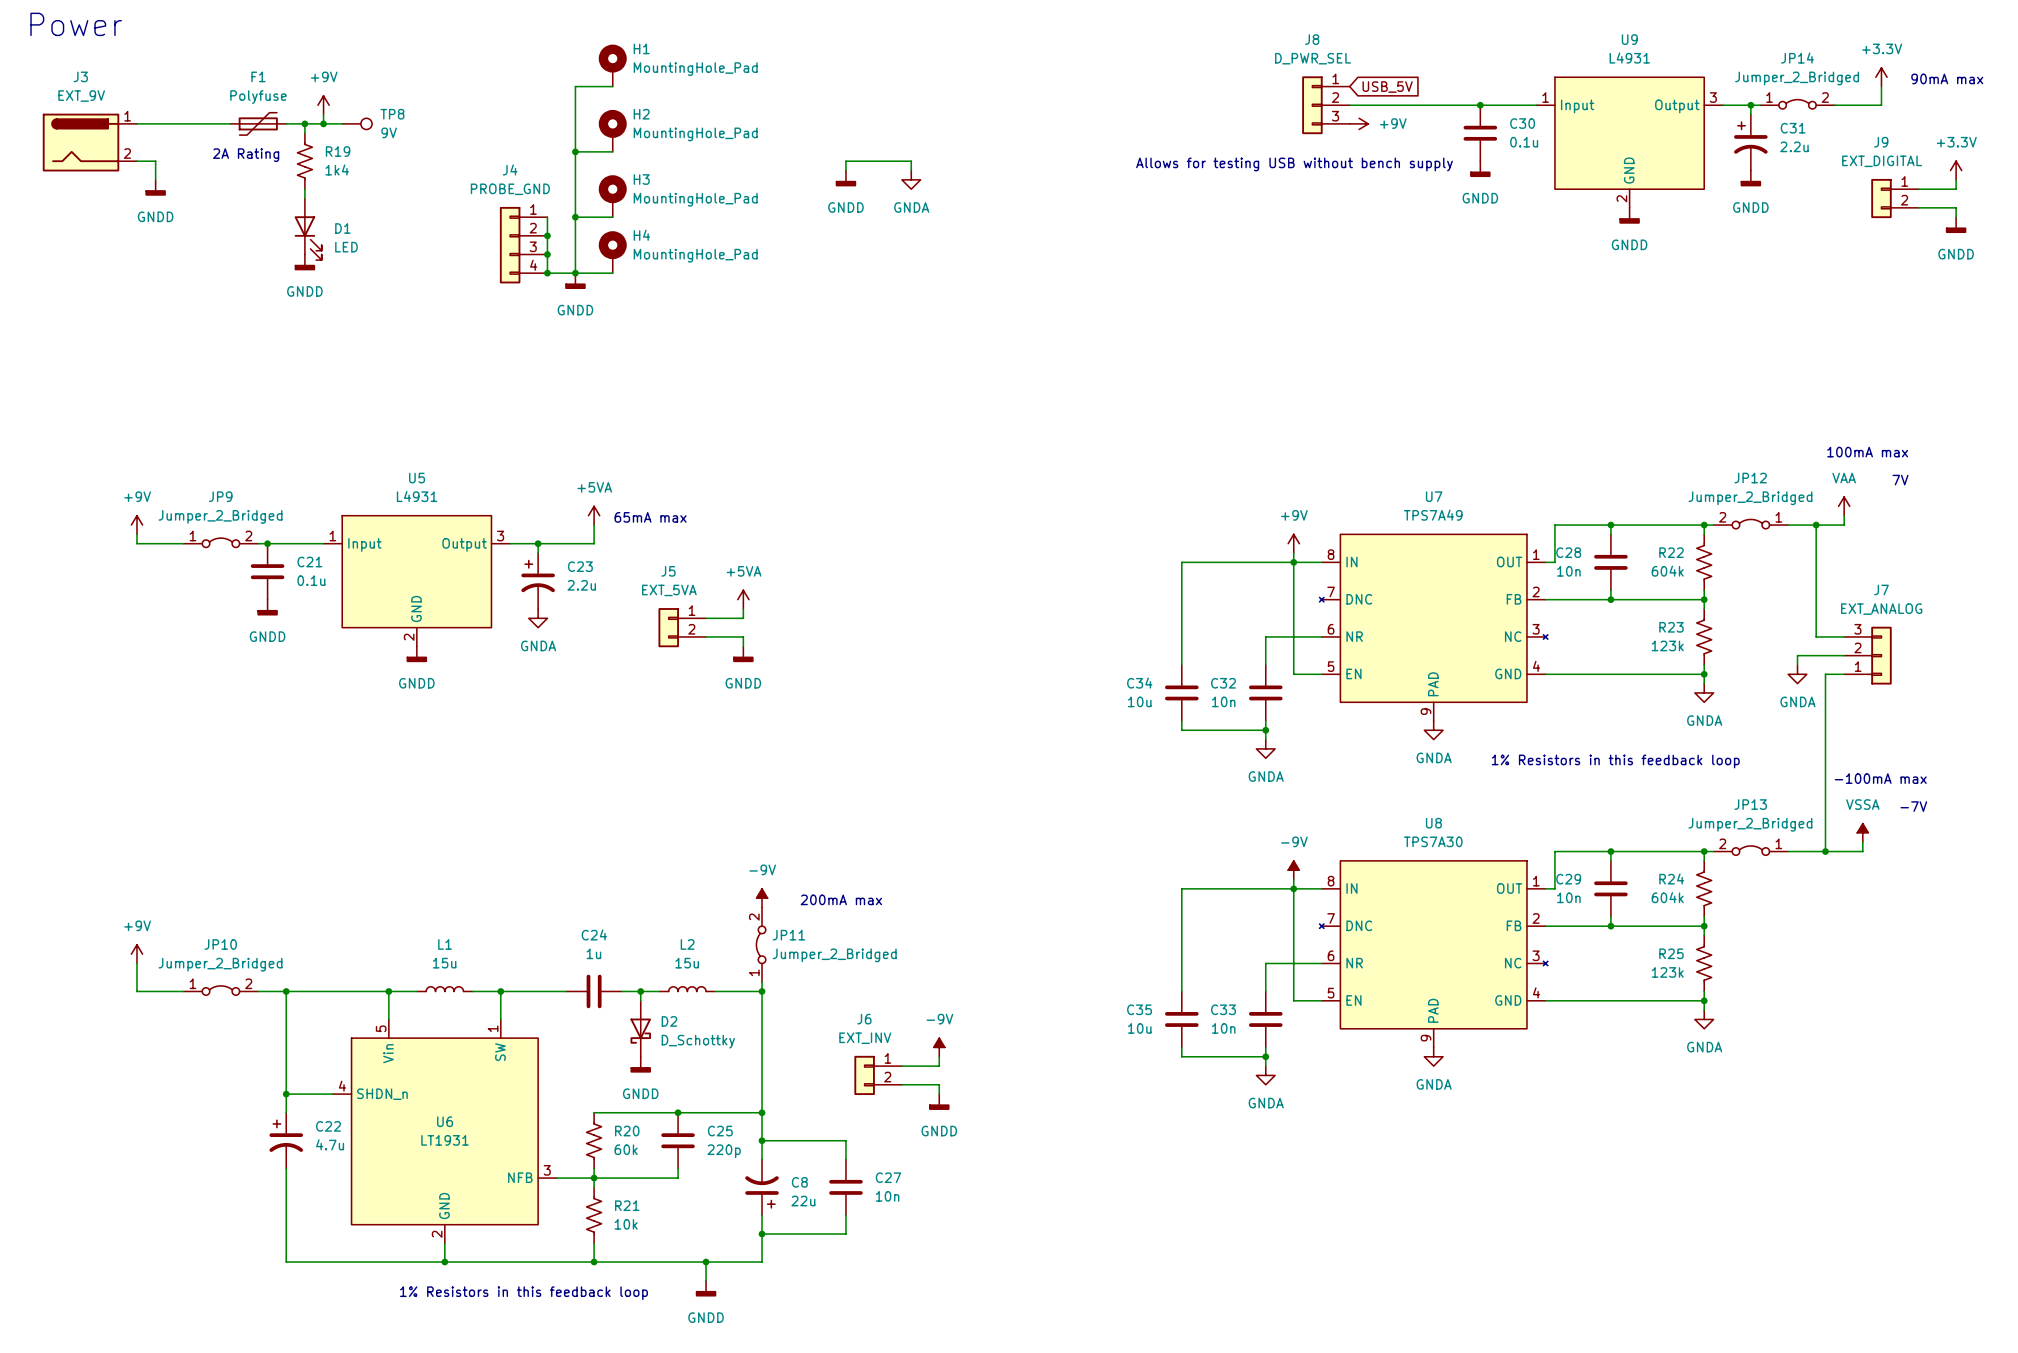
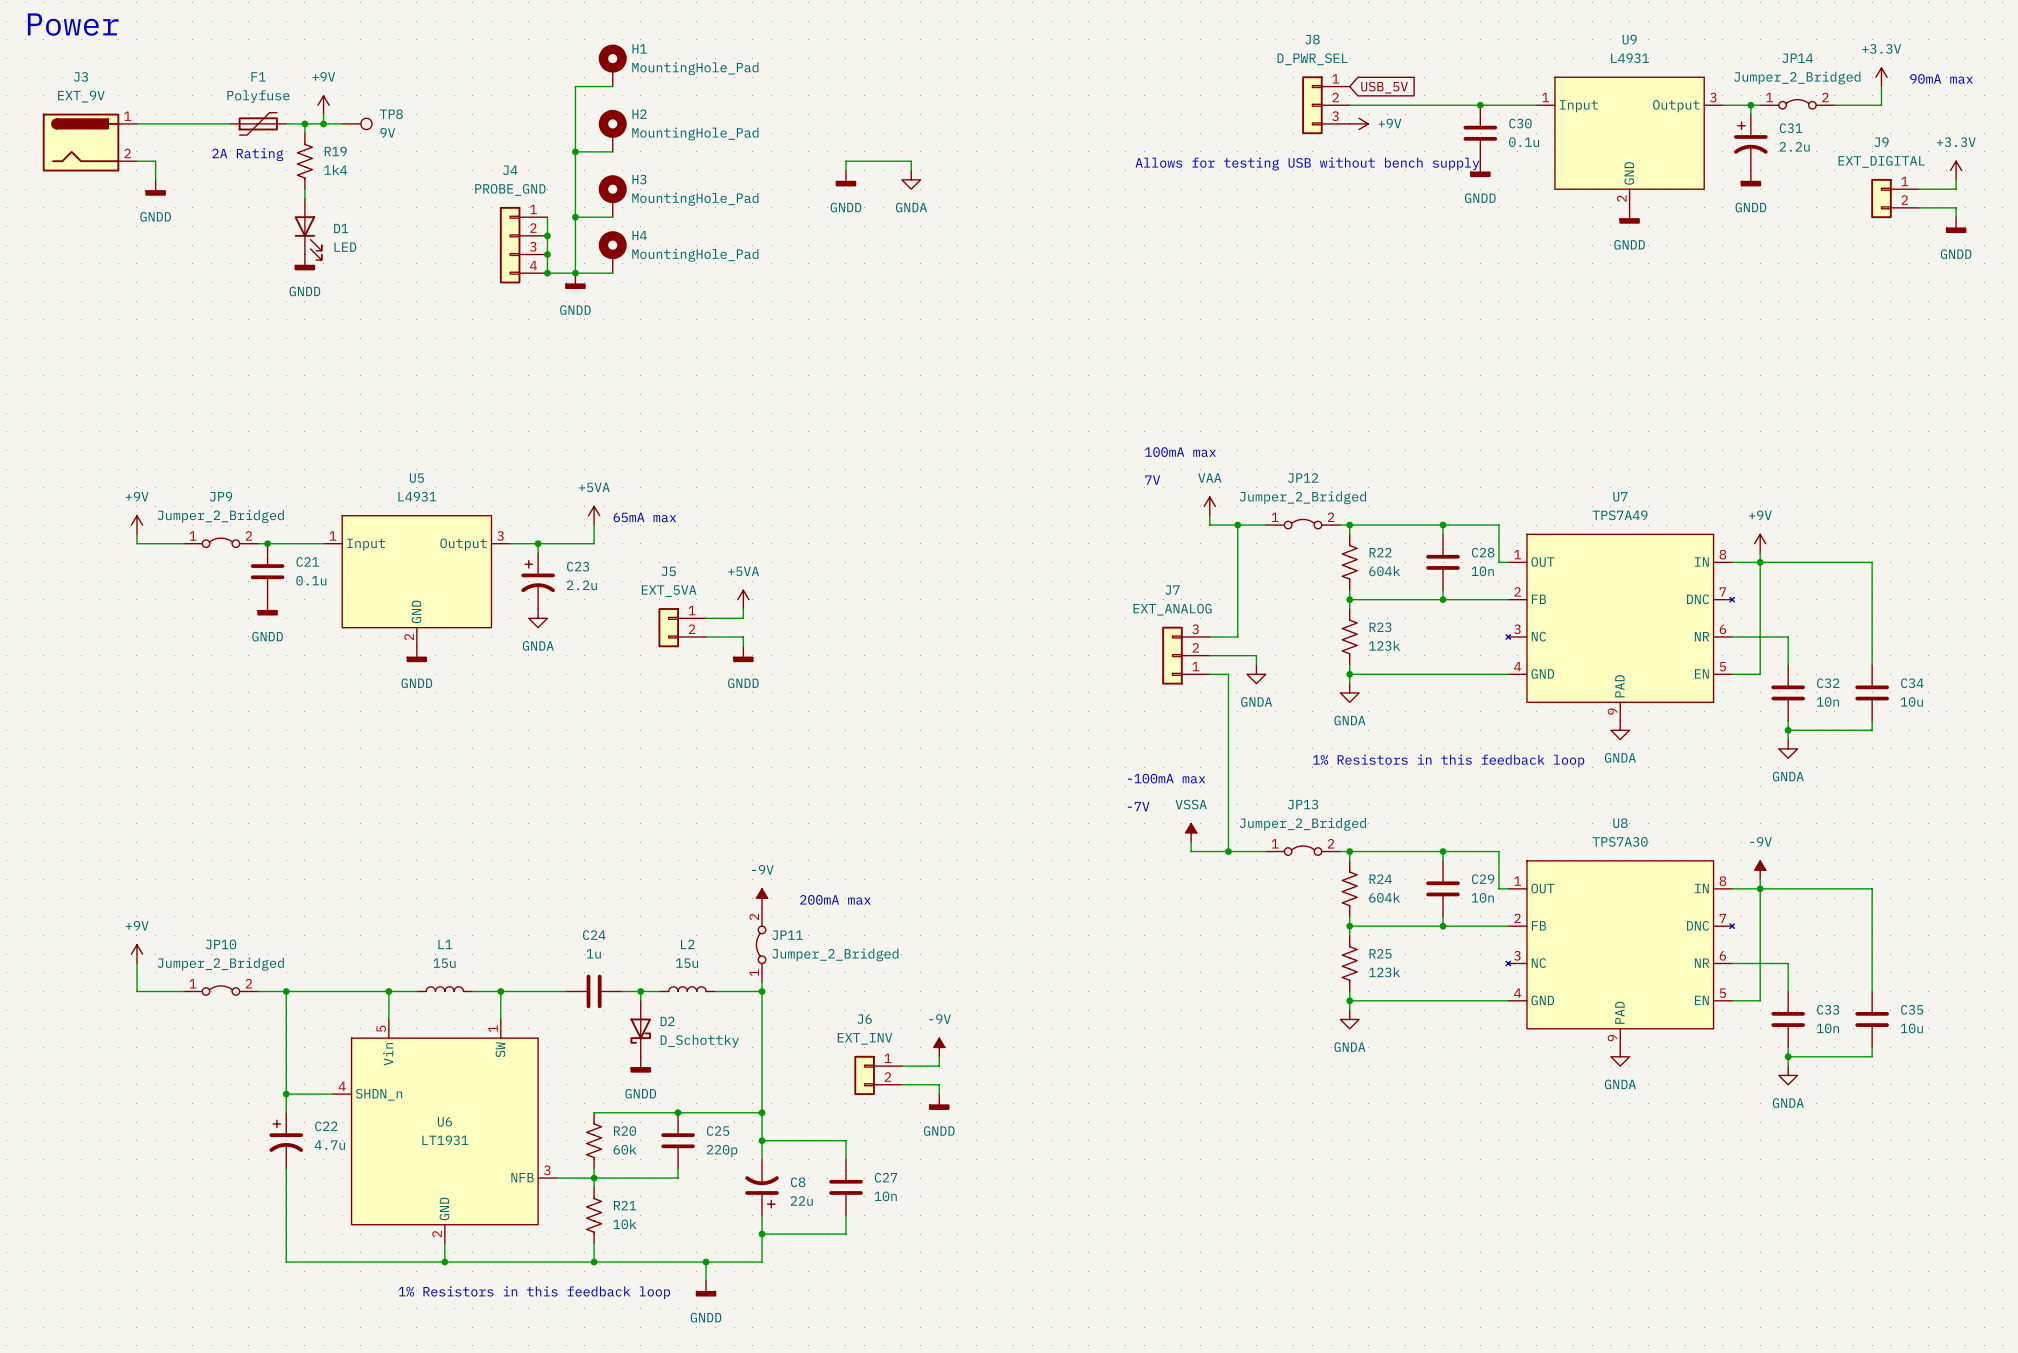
text: none -> 100mA max (1180, 452)
text: 100mA max (1867, 452) -> none
text: none -> 7V (1152, 480)
text: 7V (1900, 480) -> none
power symbol: none -> VAA (1209, 506)
power symbol: VAA (1844, 506) -> none
wire: none -> (1209, 515) (1209, 525) (1265, 525)
wire: (1844, 515) (1844, 525) (1788, 525) -> none
JP12 flip: as is (1750, 524) -> left-right (1303, 524)
JP12 position: (1750, 524) -> (1303, 524)
wire: none -> (1237, 525) (1237, 636) (1209, 636)
junction: none -> (1237, 525)
wire: none -> (1340, 525) (1498, 525) (1498, 562) (1508, 562)
wire: none -> (1349, 525) (1349, 534)
junction: none -> (1349, 525)
junction: none -> (1443, 525)
wire: (1610, 525) (1610, 534) -> (1443, 525) (1443, 534)
junction: (1610, 525) -> none
wire: (1704, 525) (1704, 534) -> none
junction: (1704, 525) -> none
wire: (1713, 525) (1554, 525) (1554, 562) (1545, 562) -> none
wire: (1816, 525) (1816, 636) (1844, 636) -> none
junction: (1816, 525) -> none
power symbol: +9V (1293, 543) -> none
power symbol: none -> +9V (1760, 543)
C28 name position: C28 (1568, 552) -> C28 (1483, 552)
wire: (1293, 553) (1293, 674) (1321, 674) -> none
wire: none -> (1760, 553) (1760, 674) (1732, 674)
junction: (1293, 562) -> none
wire: (1321, 562) (1181, 562) (1181, 664) -> none
C28 position: (1610, 562) -> (1443, 562)
R22 flip: as is (1704, 562) -> left-right (1349, 562)
R22 position: (1704, 562) -> (1349, 562)
wire: none -> (1732, 562) (1872, 562) (1872, 664)
junction: none -> (1760, 562)
C28 value position: 10n (1568, 571) -> 10n (1482, 571)
junction: none -> (1349, 599)
junction: none -> (1443, 599)
junction: (1610, 599) -> none
junction: (1704, 599) -> none
U7 flip: as is (1433, 618) -> left-right (1620, 618)
U7 position: (1433, 627) -> (1620, 627)
wire: (1321, 636) (1265, 636) (1265, 664) -> none
R23 flip: as is (1704, 636) -> left-right (1349, 636)
R23 position: (1704, 636) -> (1349, 636)
wire: none -> (1732, 636) (1788, 636) (1788, 664)
wire: none -> (1209, 655) (1256, 655) (1256, 664)
wire: (1844, 655) (1797, 655) (1797, 664) -> none
J7 position: (1867, 655) -> (1186, 655)
J7 flip: as is (1881, 655) -> left-right (1172, 655)
wire: none -> (1209, 674) (1228, 674) (1228, 851)
power symbol: none -> GNDA (1256, 674)
junction: none -> (1349, 674)
junction: (1704, 674) -> none
power symbol: GNDA (1797, 674) -> none
wire: (1844, 674) (1825, 674) (1825, 851) -> none
C34 name position: C34 (1139, 683) -> C34 (1912, 683)
C32 name position: C32 (1223, 683) -> C32 (1828, 683)
C34 position: (1181, 692) -> (1872, 692)
C32 position: (1265, 692) -> (1788, 692)
power symbol: none -> GNDA (1349, 692)
power symbol: GNDA (1704, 692) -> none
C34 value position: 10u (1139, 701) -> 10u (1911, 701)
C32 value position: 10n (1223, 701) -> 10n (1827, 701)
wire: (1181, 720) (1181, 730) (1265, 730) -> none
wire: none -> (1872, 720) (1872, 730) (1788, 730)
junction: (1265, 730) -> none
power symbol: GNDA (1433, 730) -> none
power symbol: none -> GNDA (1620, 730)
junction: none -> (1788, 730)
power symbol: GNDA (1265, 748) -> none
power symbol: none -> GNDA (1788, 748)
text: none -> 1% Resistors in this feedback loop (1448, 760)
text: 1% Resistors in this feedback loop (1615, 761) -> none
text: none -> -100mA max (1166, 778)
text: -100mA max (1880, 778) -> none
text: none -> -7V (1138, 806)
text: -7V (1913, 806) -> none
power symbol: none -> VSSA (1191, 832)
power symbol: VSSA (1862, 832) -> none
wire: none -> (1191, 842) (1191, 851) (1265, 851)
wire: (1862, 842) (1862, 851) (1788, 851) -> none
JP13 flip: as is (1750, 850) -> left-right (1303, 850)
JP13 position: (1750, 850) -> (1303, 850)
junction: none -> (1228, 851)
wire: none -> (1340, 851) (1498, 851) (1498, 888) (1508, 888)
wire: none -> (1349, 851) (1349, 860)
junction: none -> (1349, 851)
junction: none -> (1443, 851)
wire: (1610, 851) (1610, 860) -> (1443, 851) (1443, 860)
junction: (1610, 851) -> none
wire: (1704, 851) (1704, 860) -> none
junction: (1704, 851) -> none
wire: (1713, 851) (1554, 851) (1554, 888) (1545, 888) -> none
junction: (1825, 851) -> none
power symbol: -9V (1293, 870) -> none
power symbol: none -> -9V (1760, 870)
wire: (1293, 879) (1293, 1000) (1321, 1000) -> none
C29 name position: C29 (1568, 879) -> C29 (1483, 879)
wire: none -> (1760, 879) (1760, 1000) (1732, 1000)
junction: (1293, 888) -> none
wire: (1321, 888) (1181, 888) (1181, 991) -> none
C29 position: (1610, 888) -> (1443, 888)
R24 flip: as is (1704, 888) -> left-right (1349, 888)
R24 position: (1704, 888) -> (1349, 888)
wire: none -> (1732, 888) (1872, 888) (1872, 991)
junction: none -> (1760, 888)
C29 value position: 10n (1568, 897) -> 10n (1482, 897)
junction: none -> (1349, 926)
junction: none -> (1443, 926)
junction: (1610, 926) -> none
junction: (1704, 926) -> none
U8 flip: as is (1433, 944) -> left-right (1620, 944)
U8 position: (1433, 954) -> (1620, 954)
wire: (1321, 963) (1265, 963) (1265, 991) -> none
R25 flip: as is (1704, 963) -> left-right (1349, 963)
R25 position: (1704, 963) -> (1349, 963)
wire: none -> (1732, 963) (1788, 963) (1788, 991)
junction: none -> (1349, 1000)
junction: (1704, 1000) -> none
C35 name position: C35 (1139, 1009) -> C35 (1912, 1009)
C33 name position: C33 (1223, 1009) -> C33 (1828, 1009)
C35 position: (1181, 1019) -> (1872, 1019)
C33 position: (1265, 1019) -> (1788, 1019)
power symbol: none -> GNDA (1349, 1019)
power symbol: GNDA (1704, 1019) -> none
C35 value position: 10u (1139, 1028) -> 10u (1911, 1028)
C33 value position: 10n (1223, 1028) -> 10n (1827, 1028)
wire: (1181, 1047) (1181, 1056) (1265, 1056) -> none
wire: none -> (1872, 1047) (1872, 1056) (1788, 1056)
junction: (1265, 1056) -> none
power symbol: GNDA (1433, 1056) -> none
power symbol: none -> GNDA (1620, 1056)
junction: none -> (1788, 1056)
power symbol: GNDA (1265, 1075) -> none
power symbol: none -> GNDA (1788, 1075)

